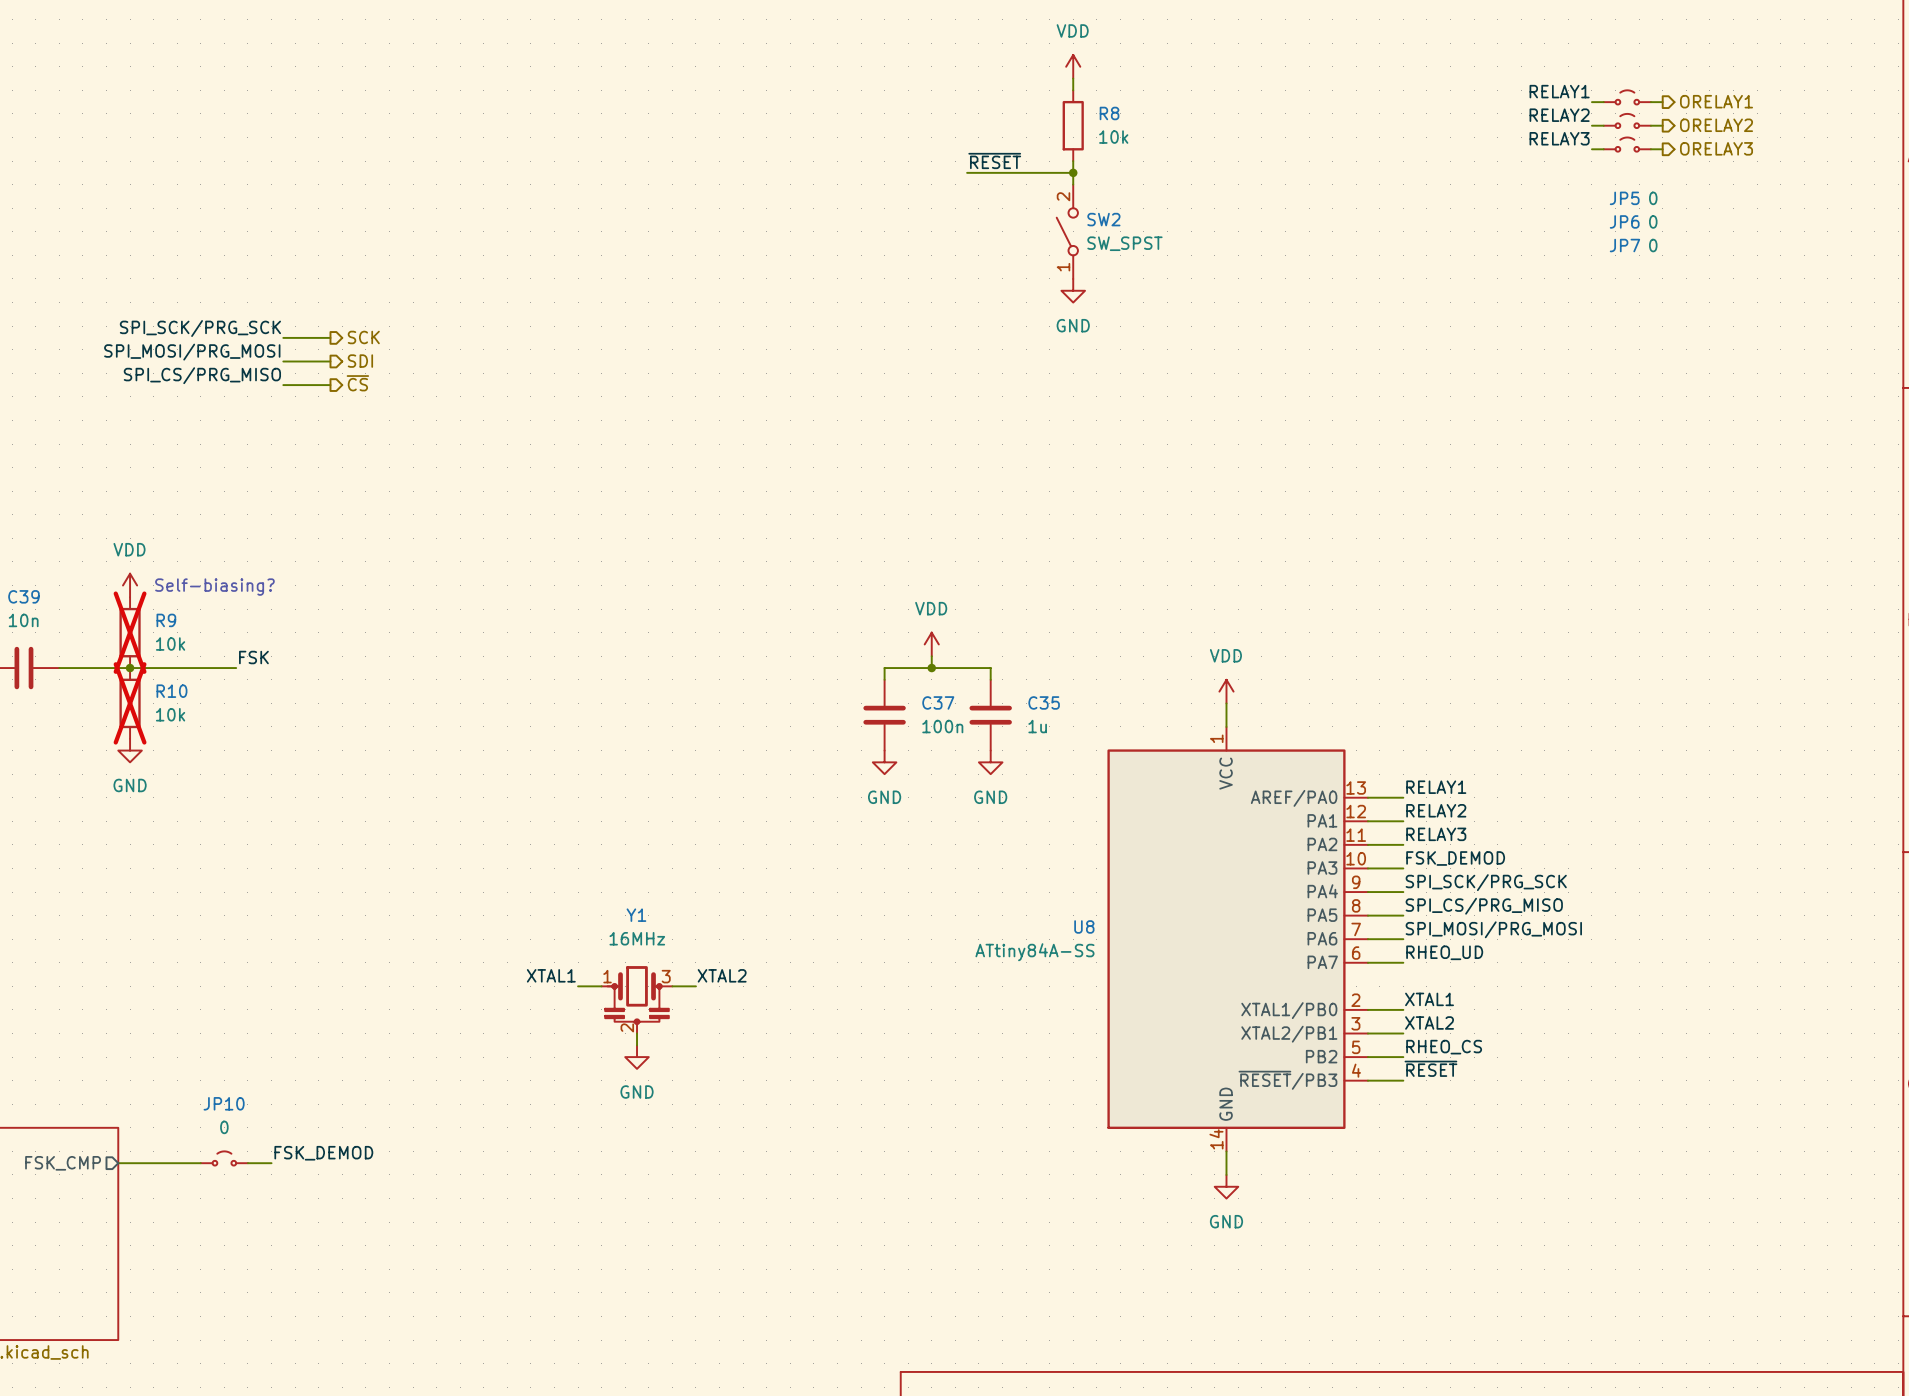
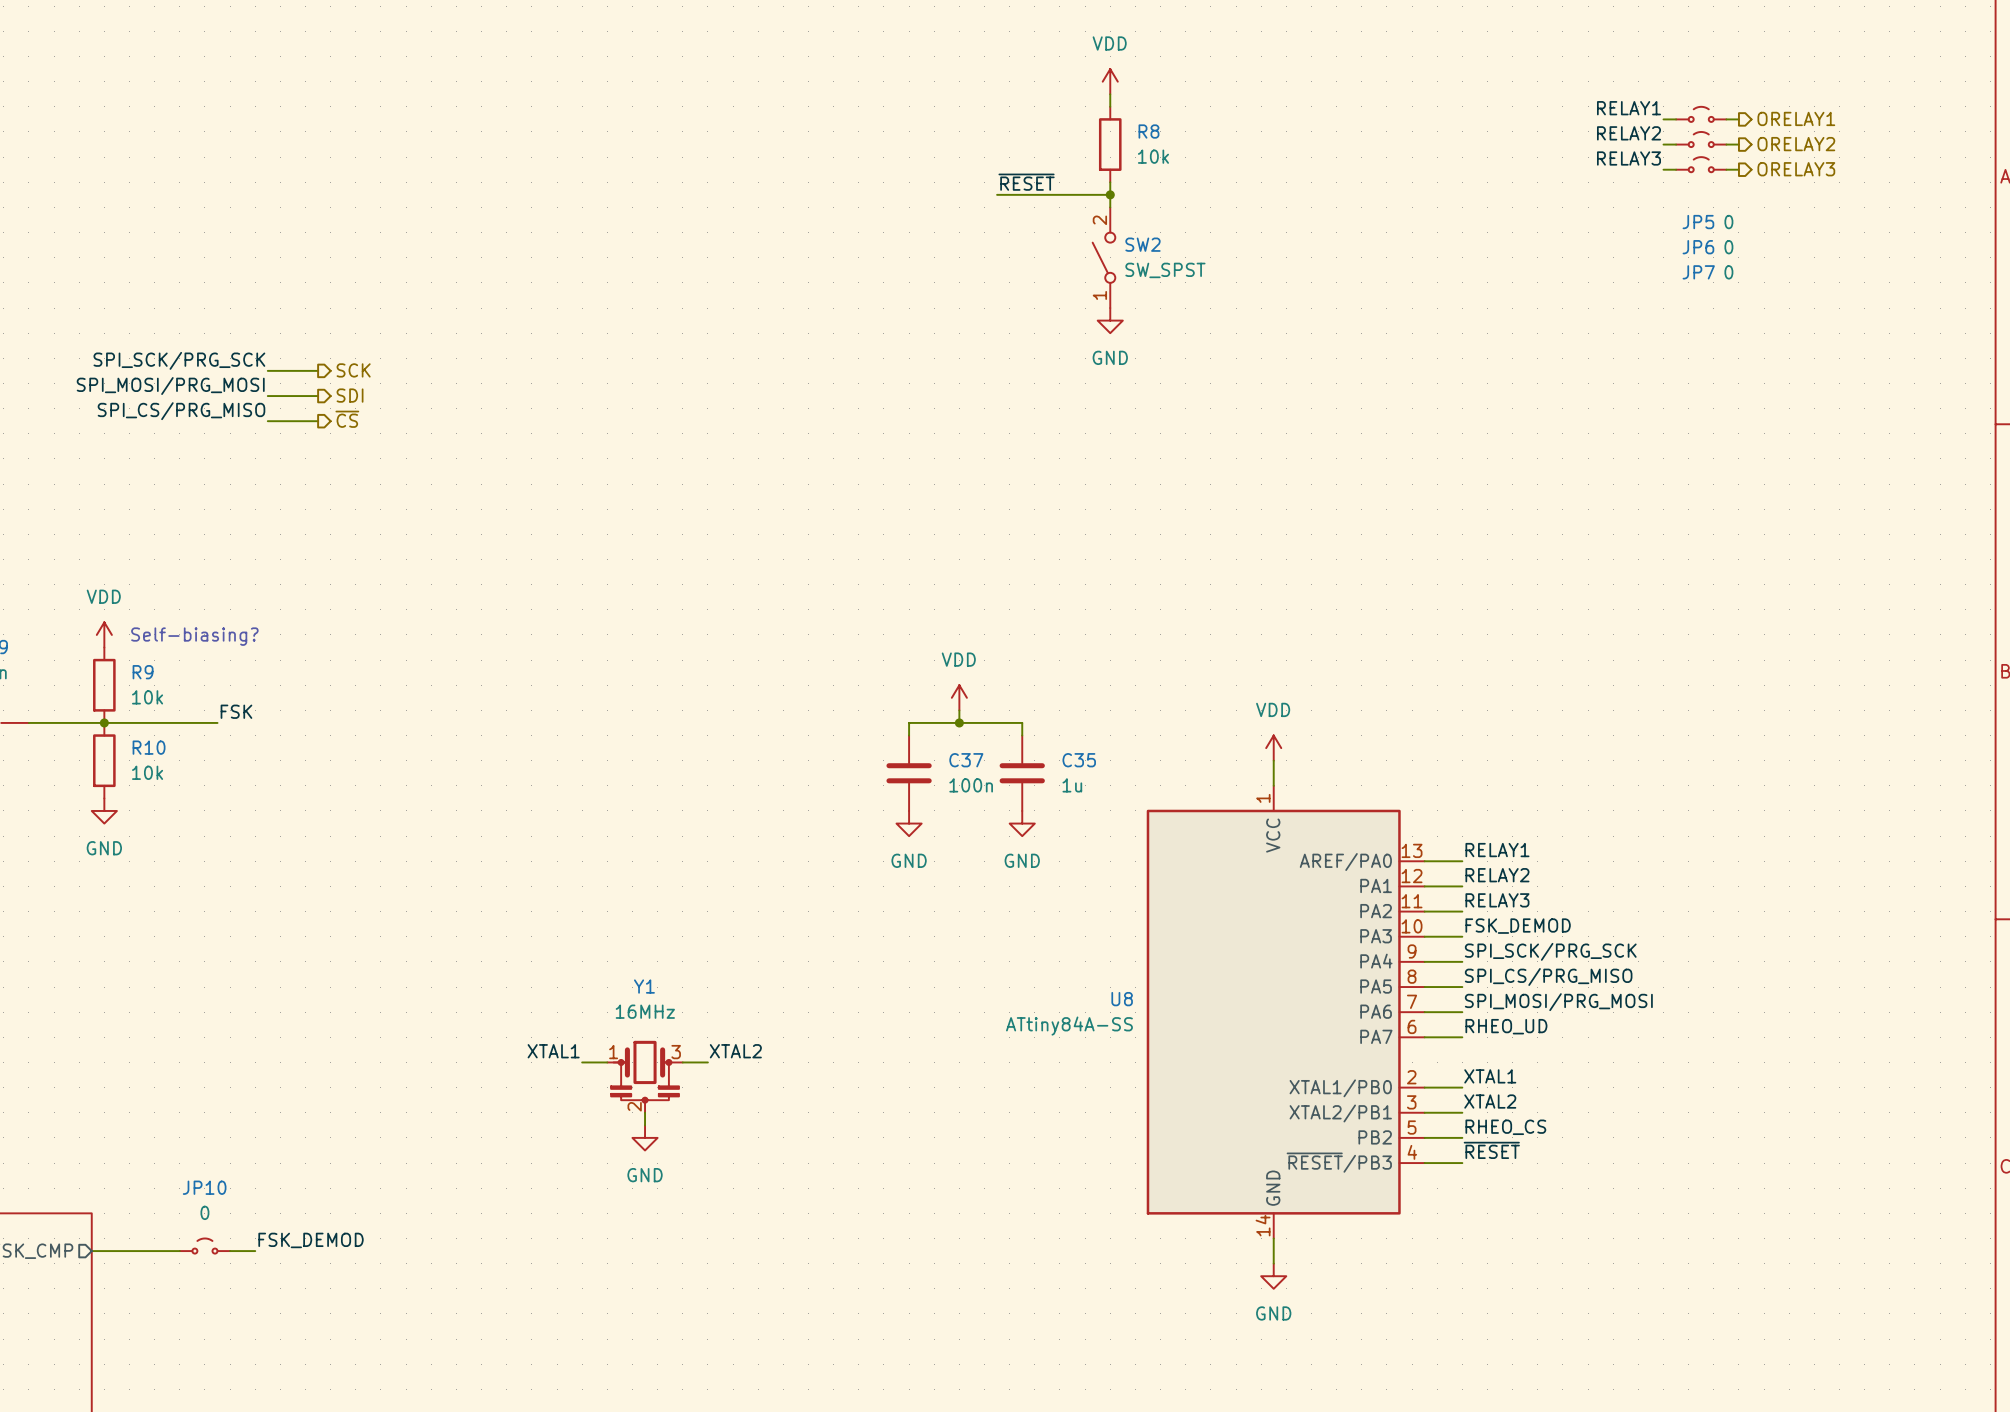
R9 do-not-place cross: (130, 632) -> none
R10 do-not-place cross: (130, 703) -> none

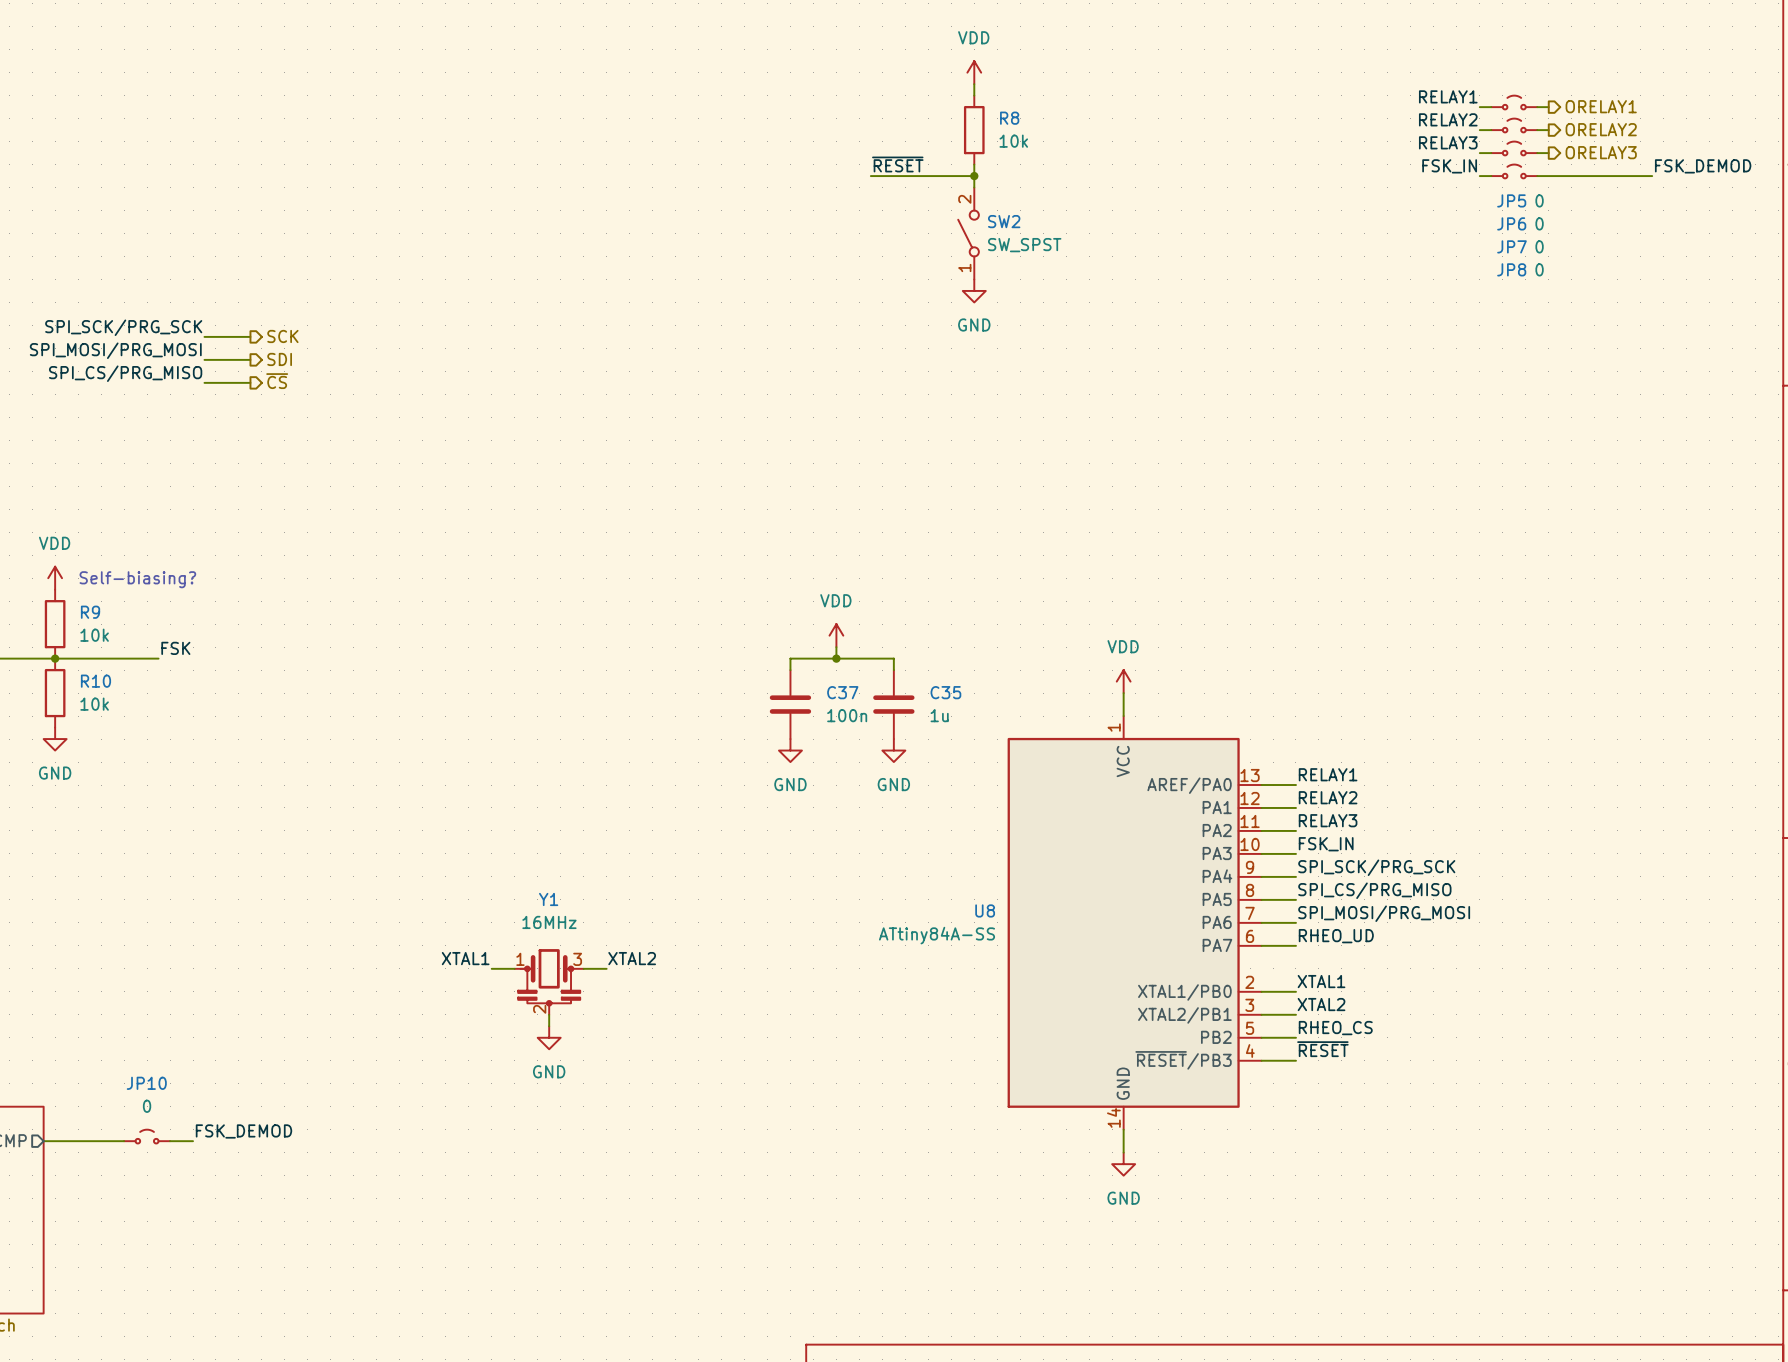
label: none -> FSK_IN (1449, 166)
label: none -> FSK_DEMOD (1703, 166)
JP8: none -> 0 (1514, 171)
wire: none -> (1479, 176) (1491, 176)
wire: none -> (1537, 176) (1652, 176)
label: FSK_DEMOD (1518, 926) -> FSK_IN (1326, 844)

